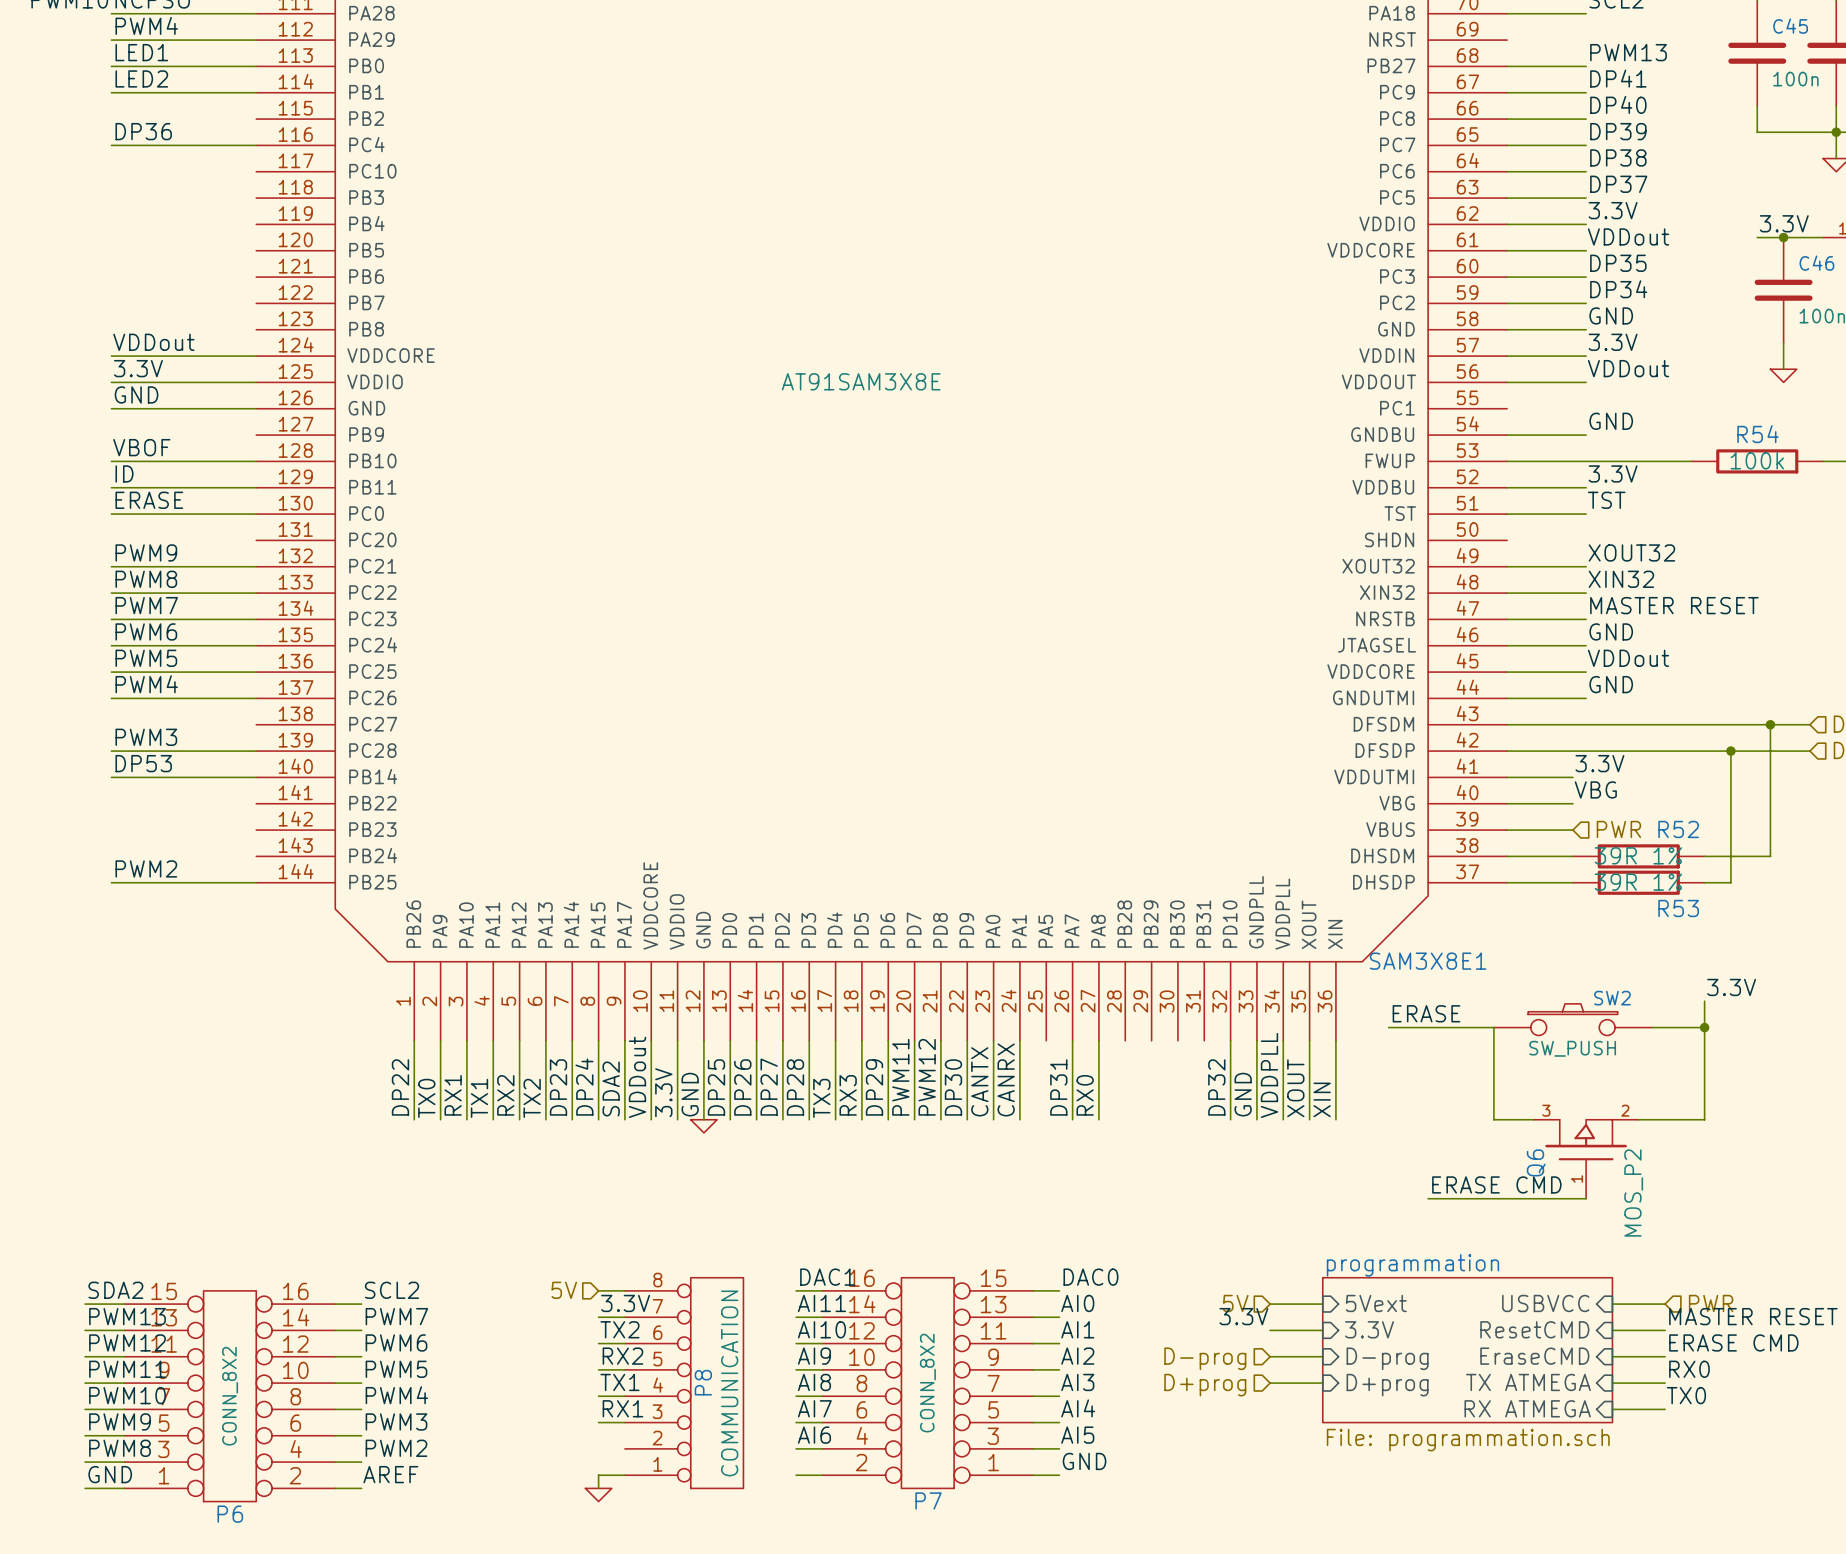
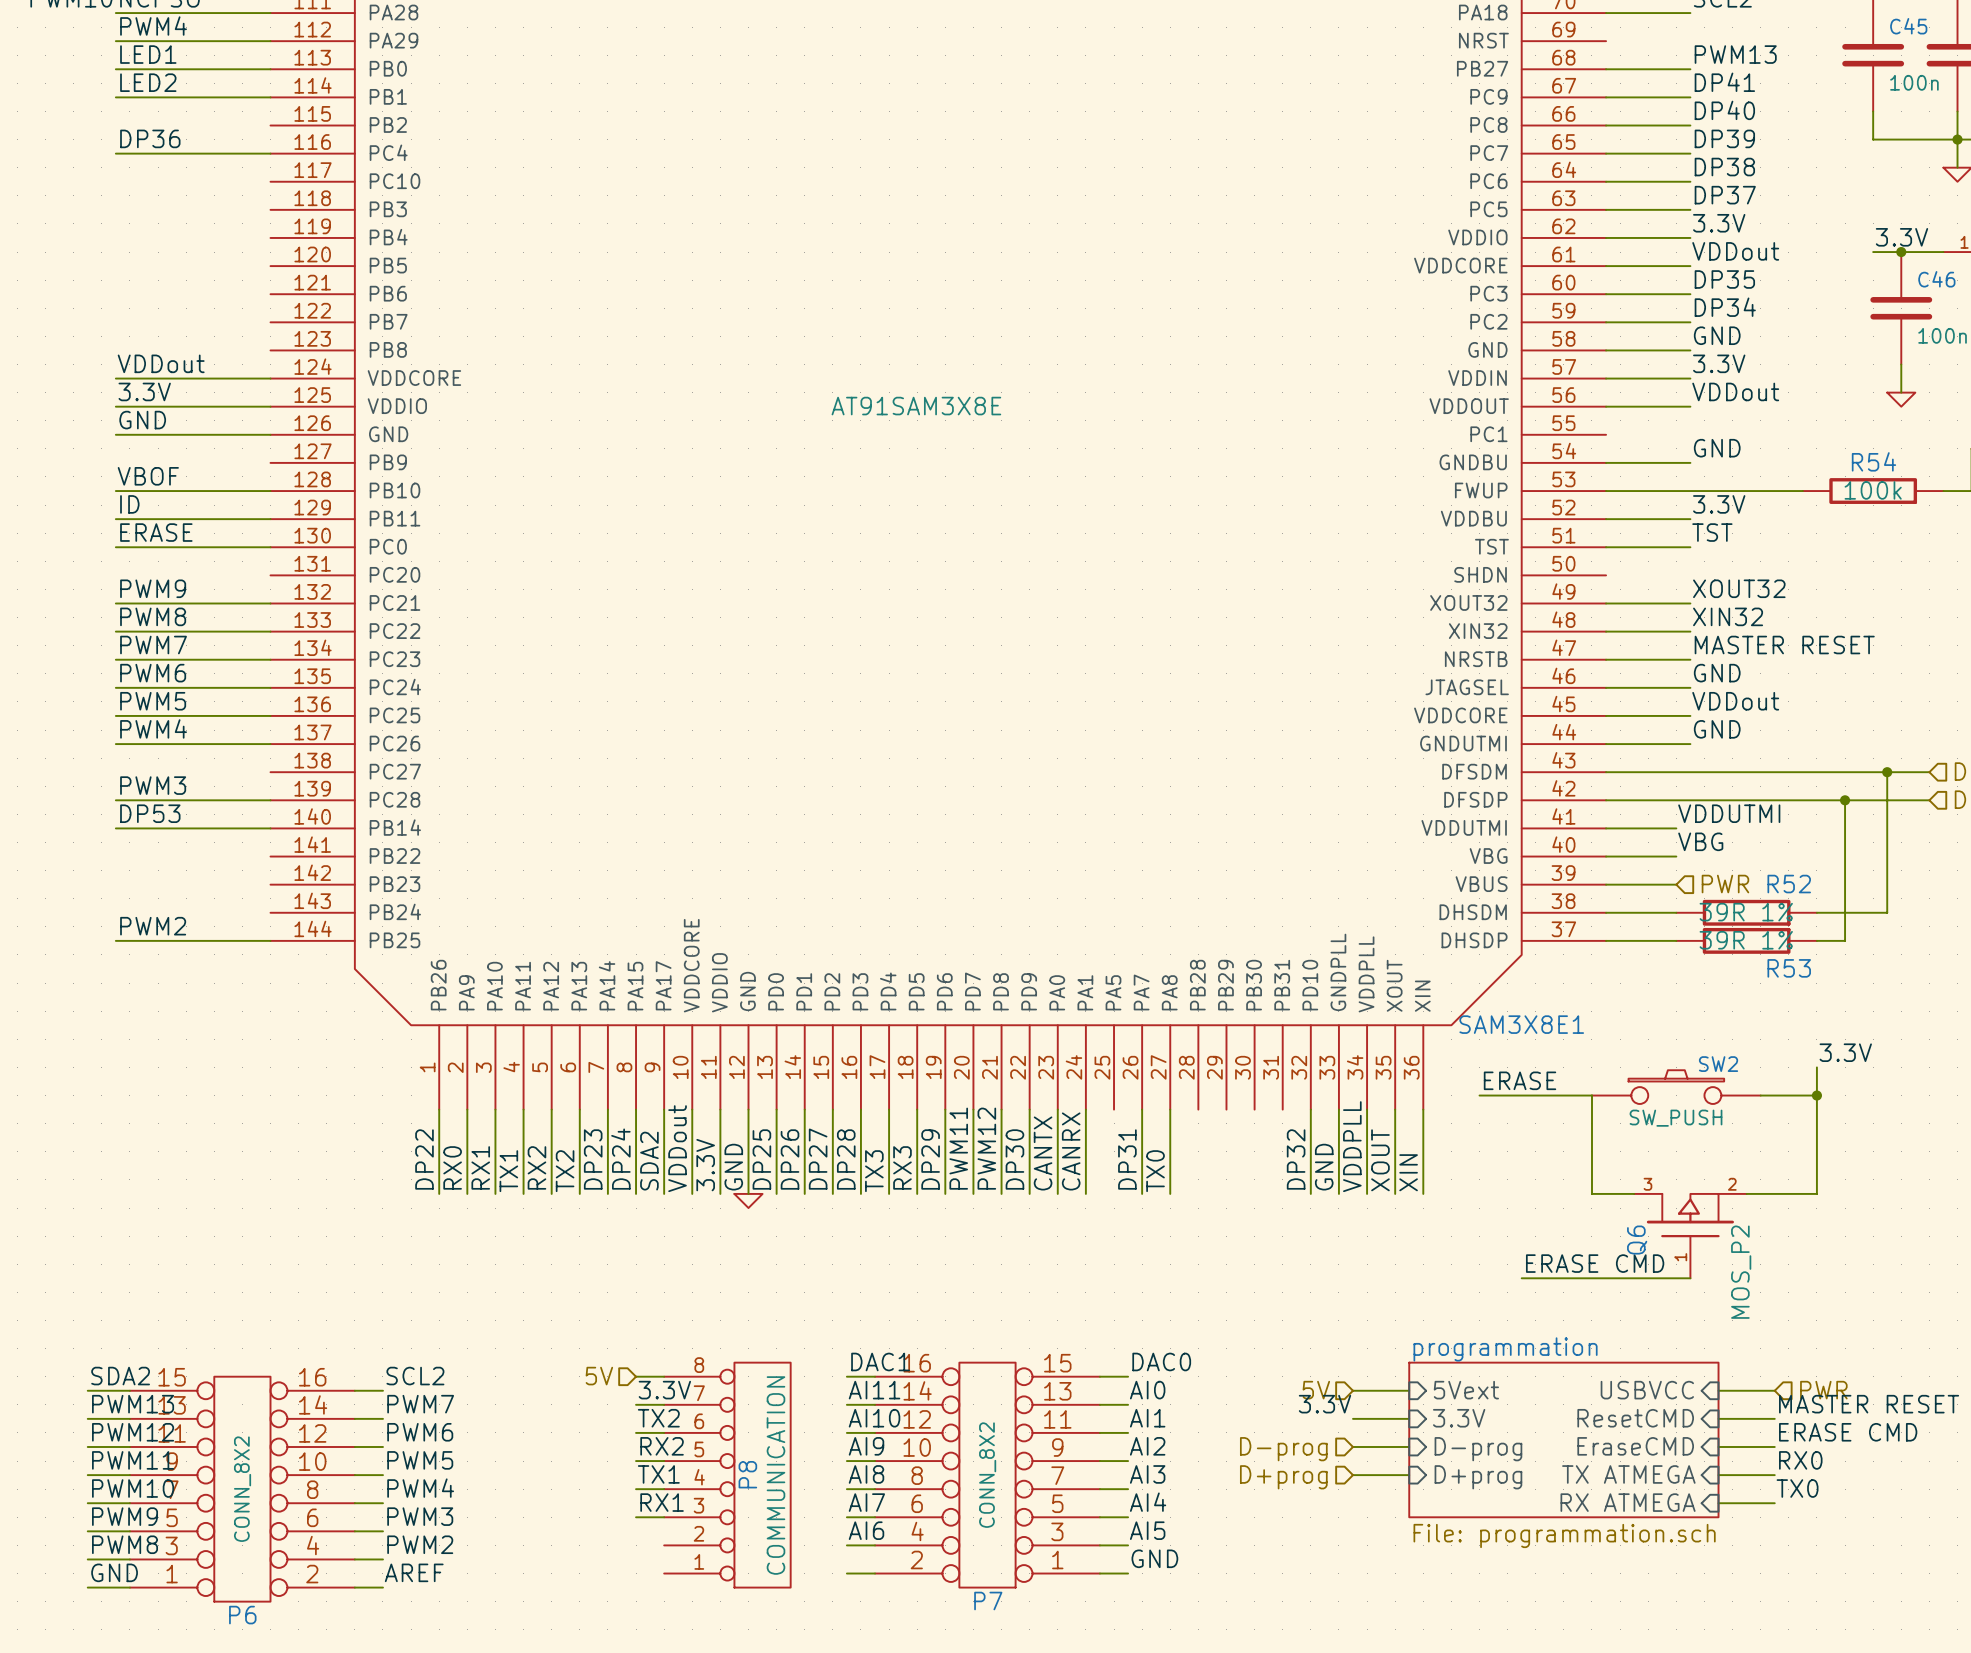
label: 3.3V (1599, 763) -> VDDUTMI (1729, 813)
label: RX0 (1085, 1095) -> TX0 (1155, 1171)
label: TX0 (426, 1098) -> RX0 (452, 1167)
wire: (624, 1475) (598, 1475) (598, 1488) -> none
power symbol: (598, 1494) -> none

